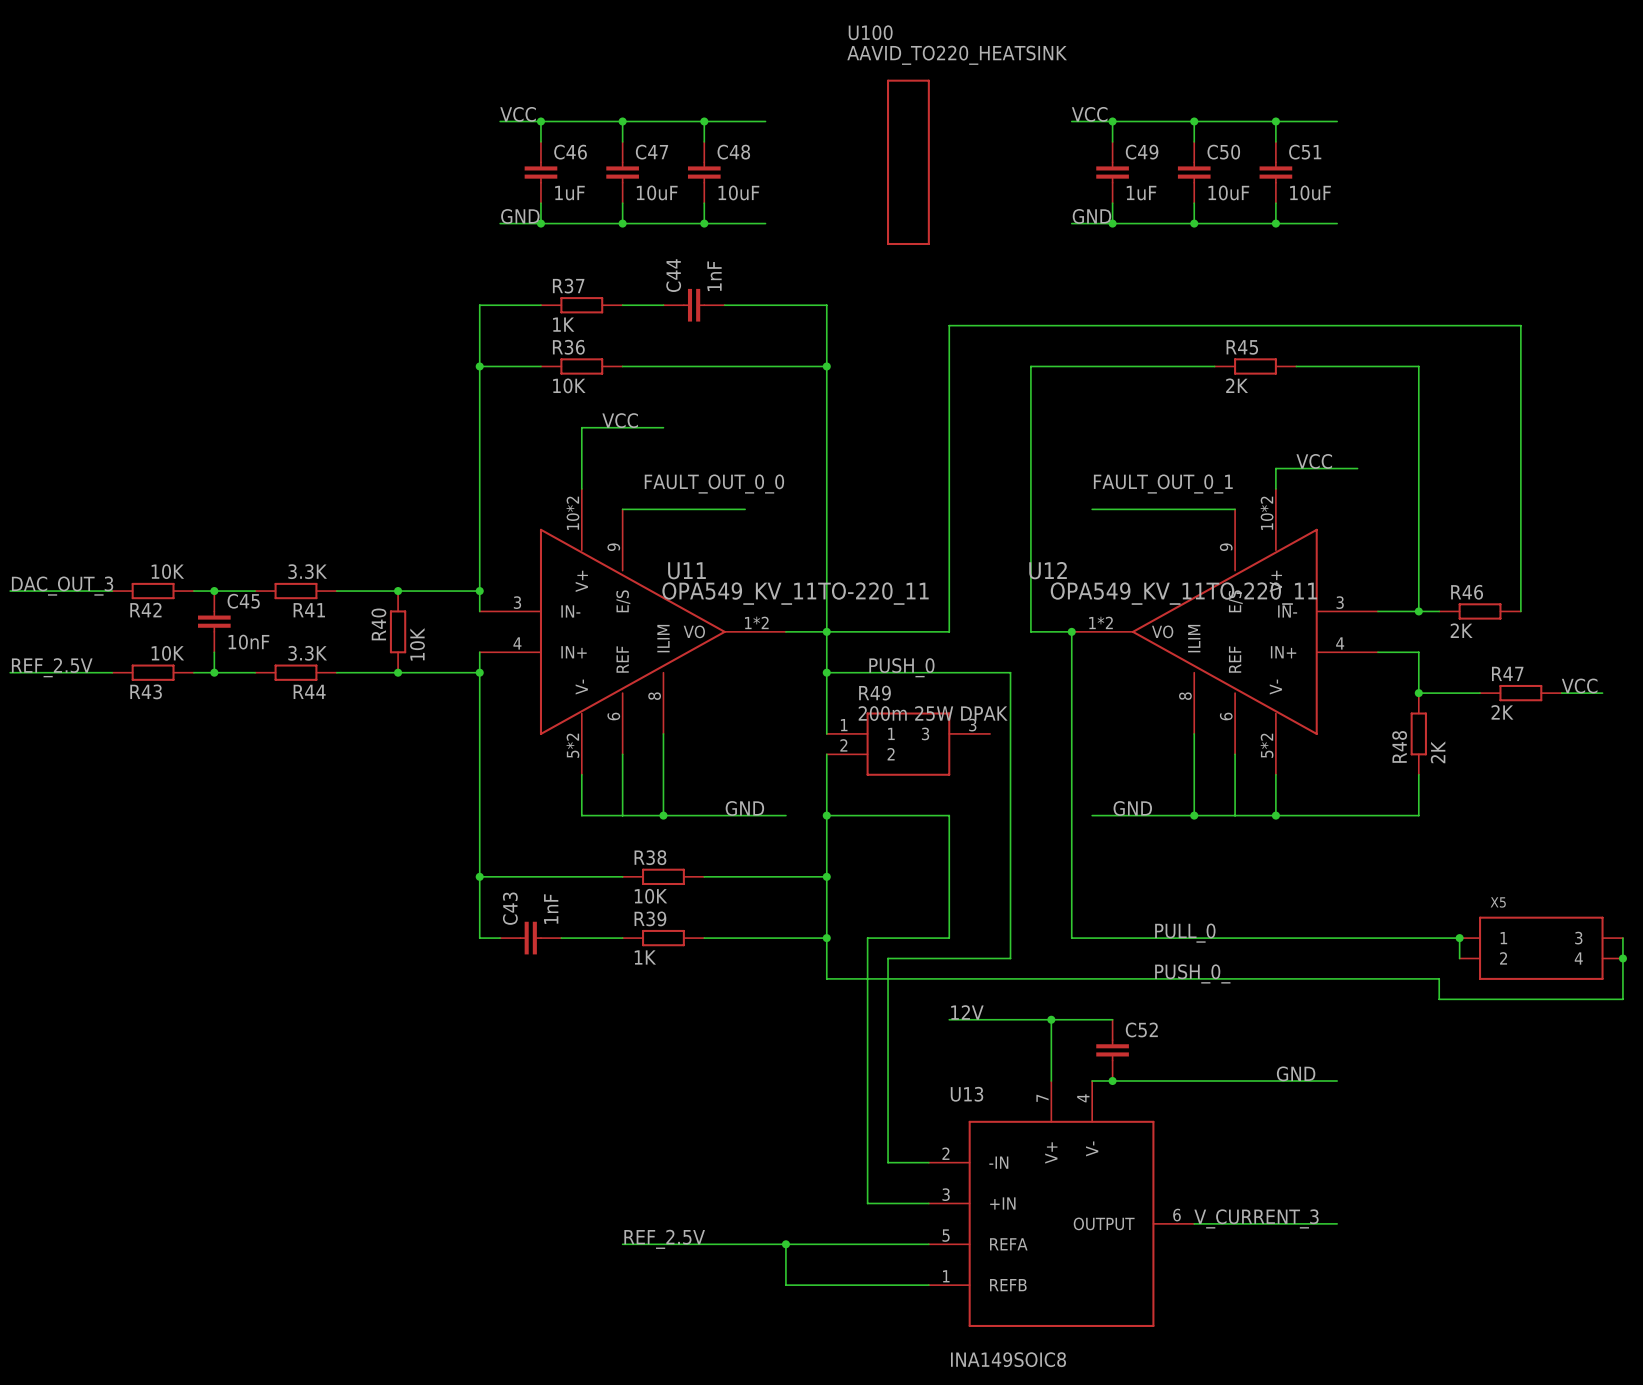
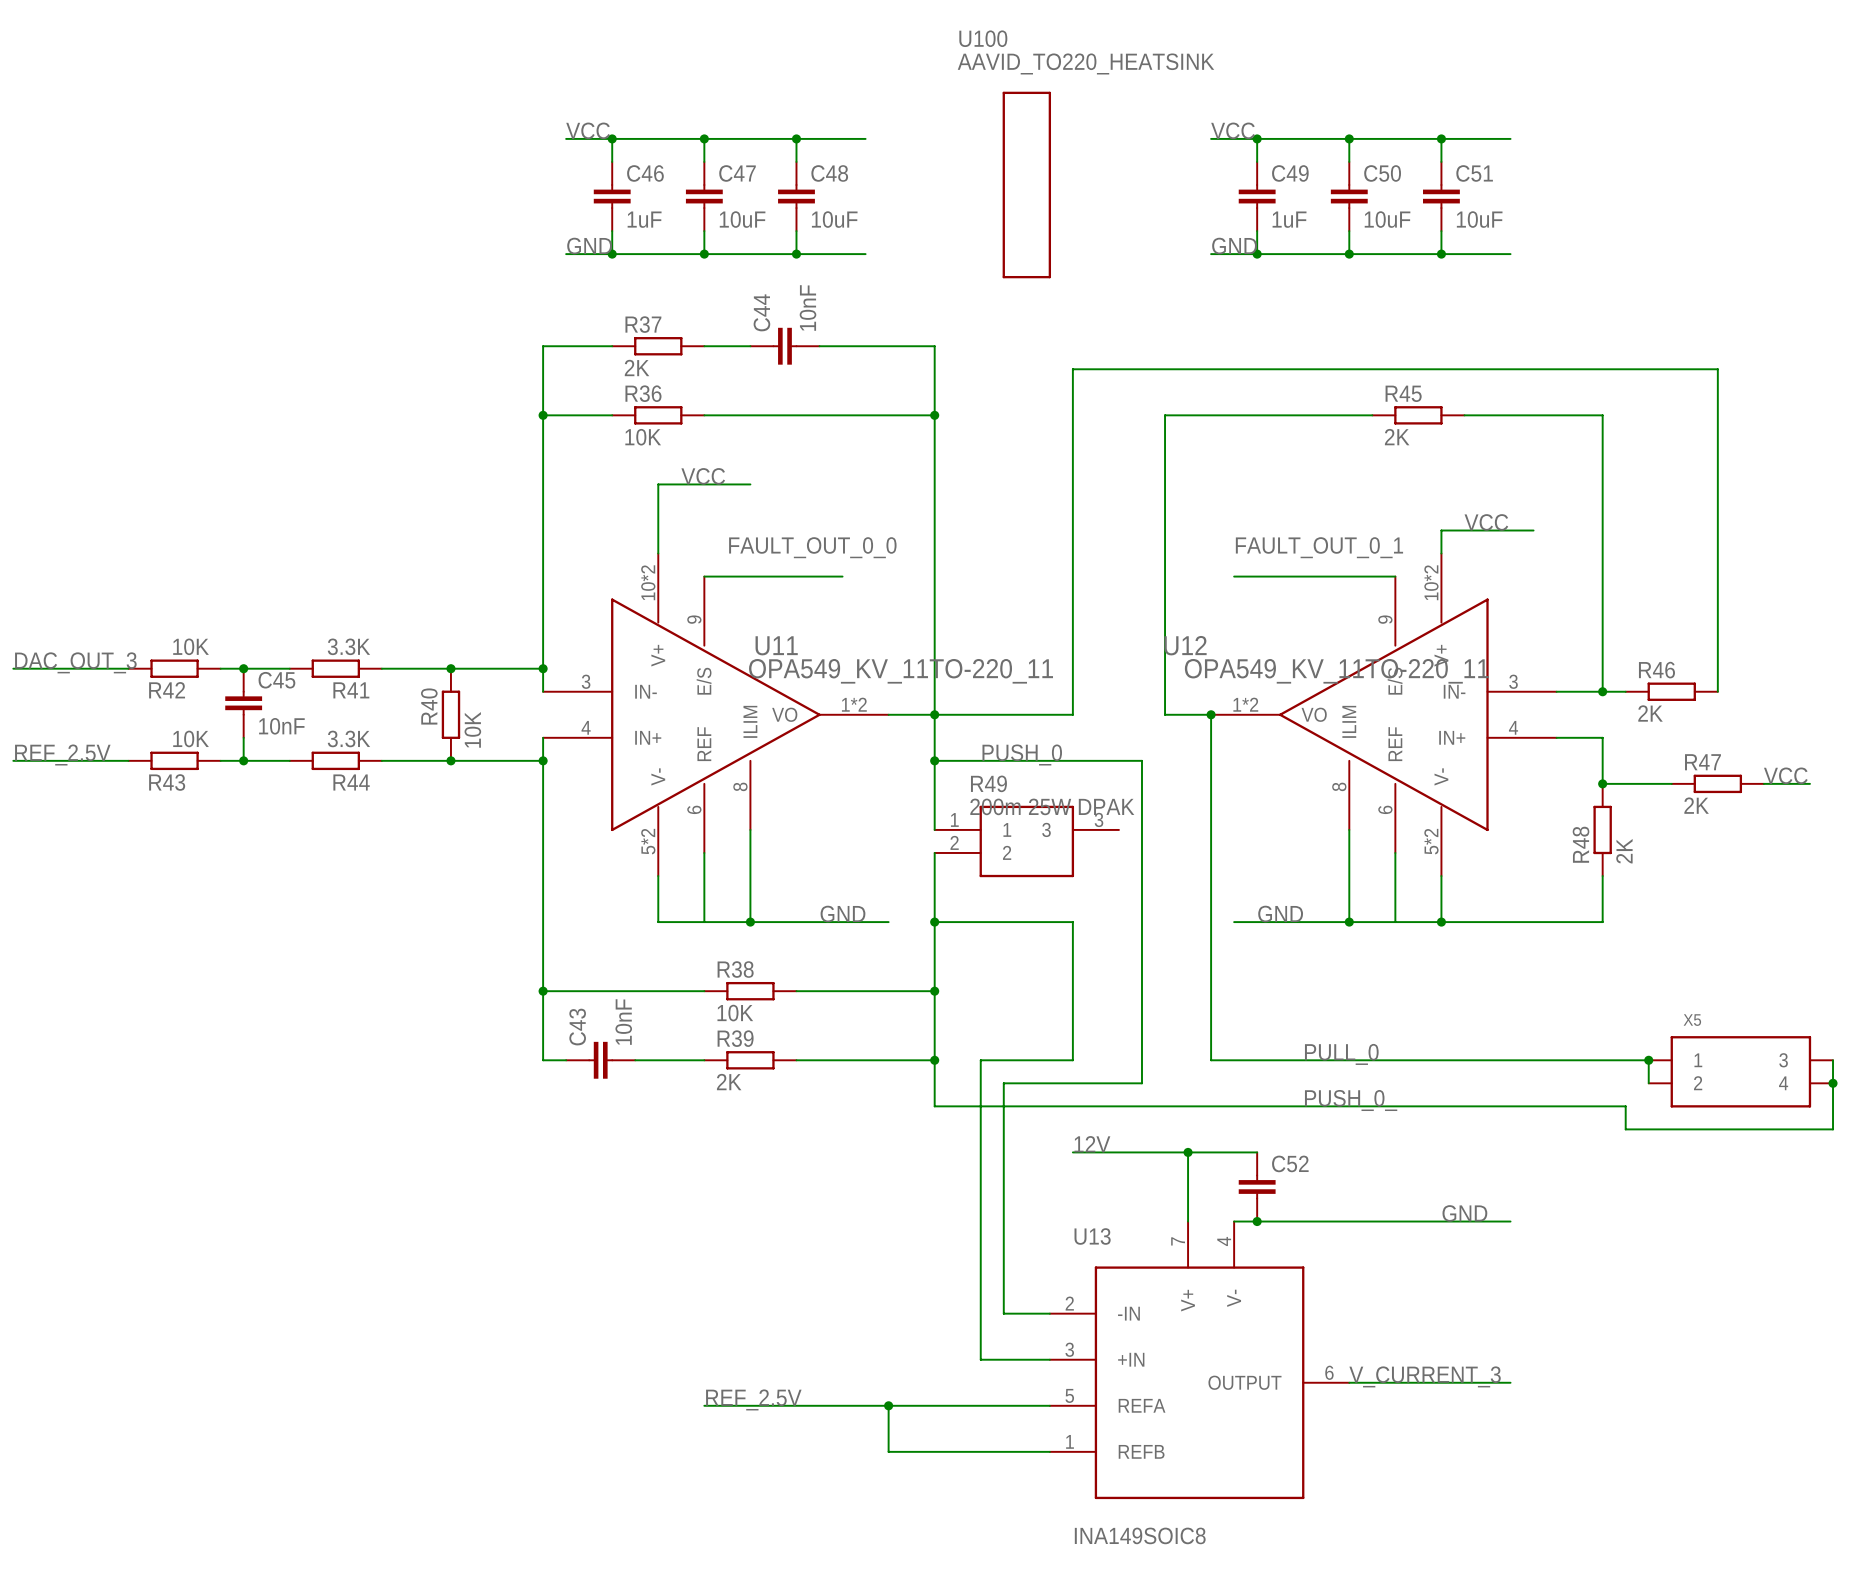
C44 value: 1nF (714, 276) -> 10nF (807, 308)
R37 value: 1K (563, 324) -> 2K (637, 368)
C43 value: 1nF (551, 909) -> 10nF (623, 1022)
R39 value: 1K (645, 957) -> 2K (729, 1082)

